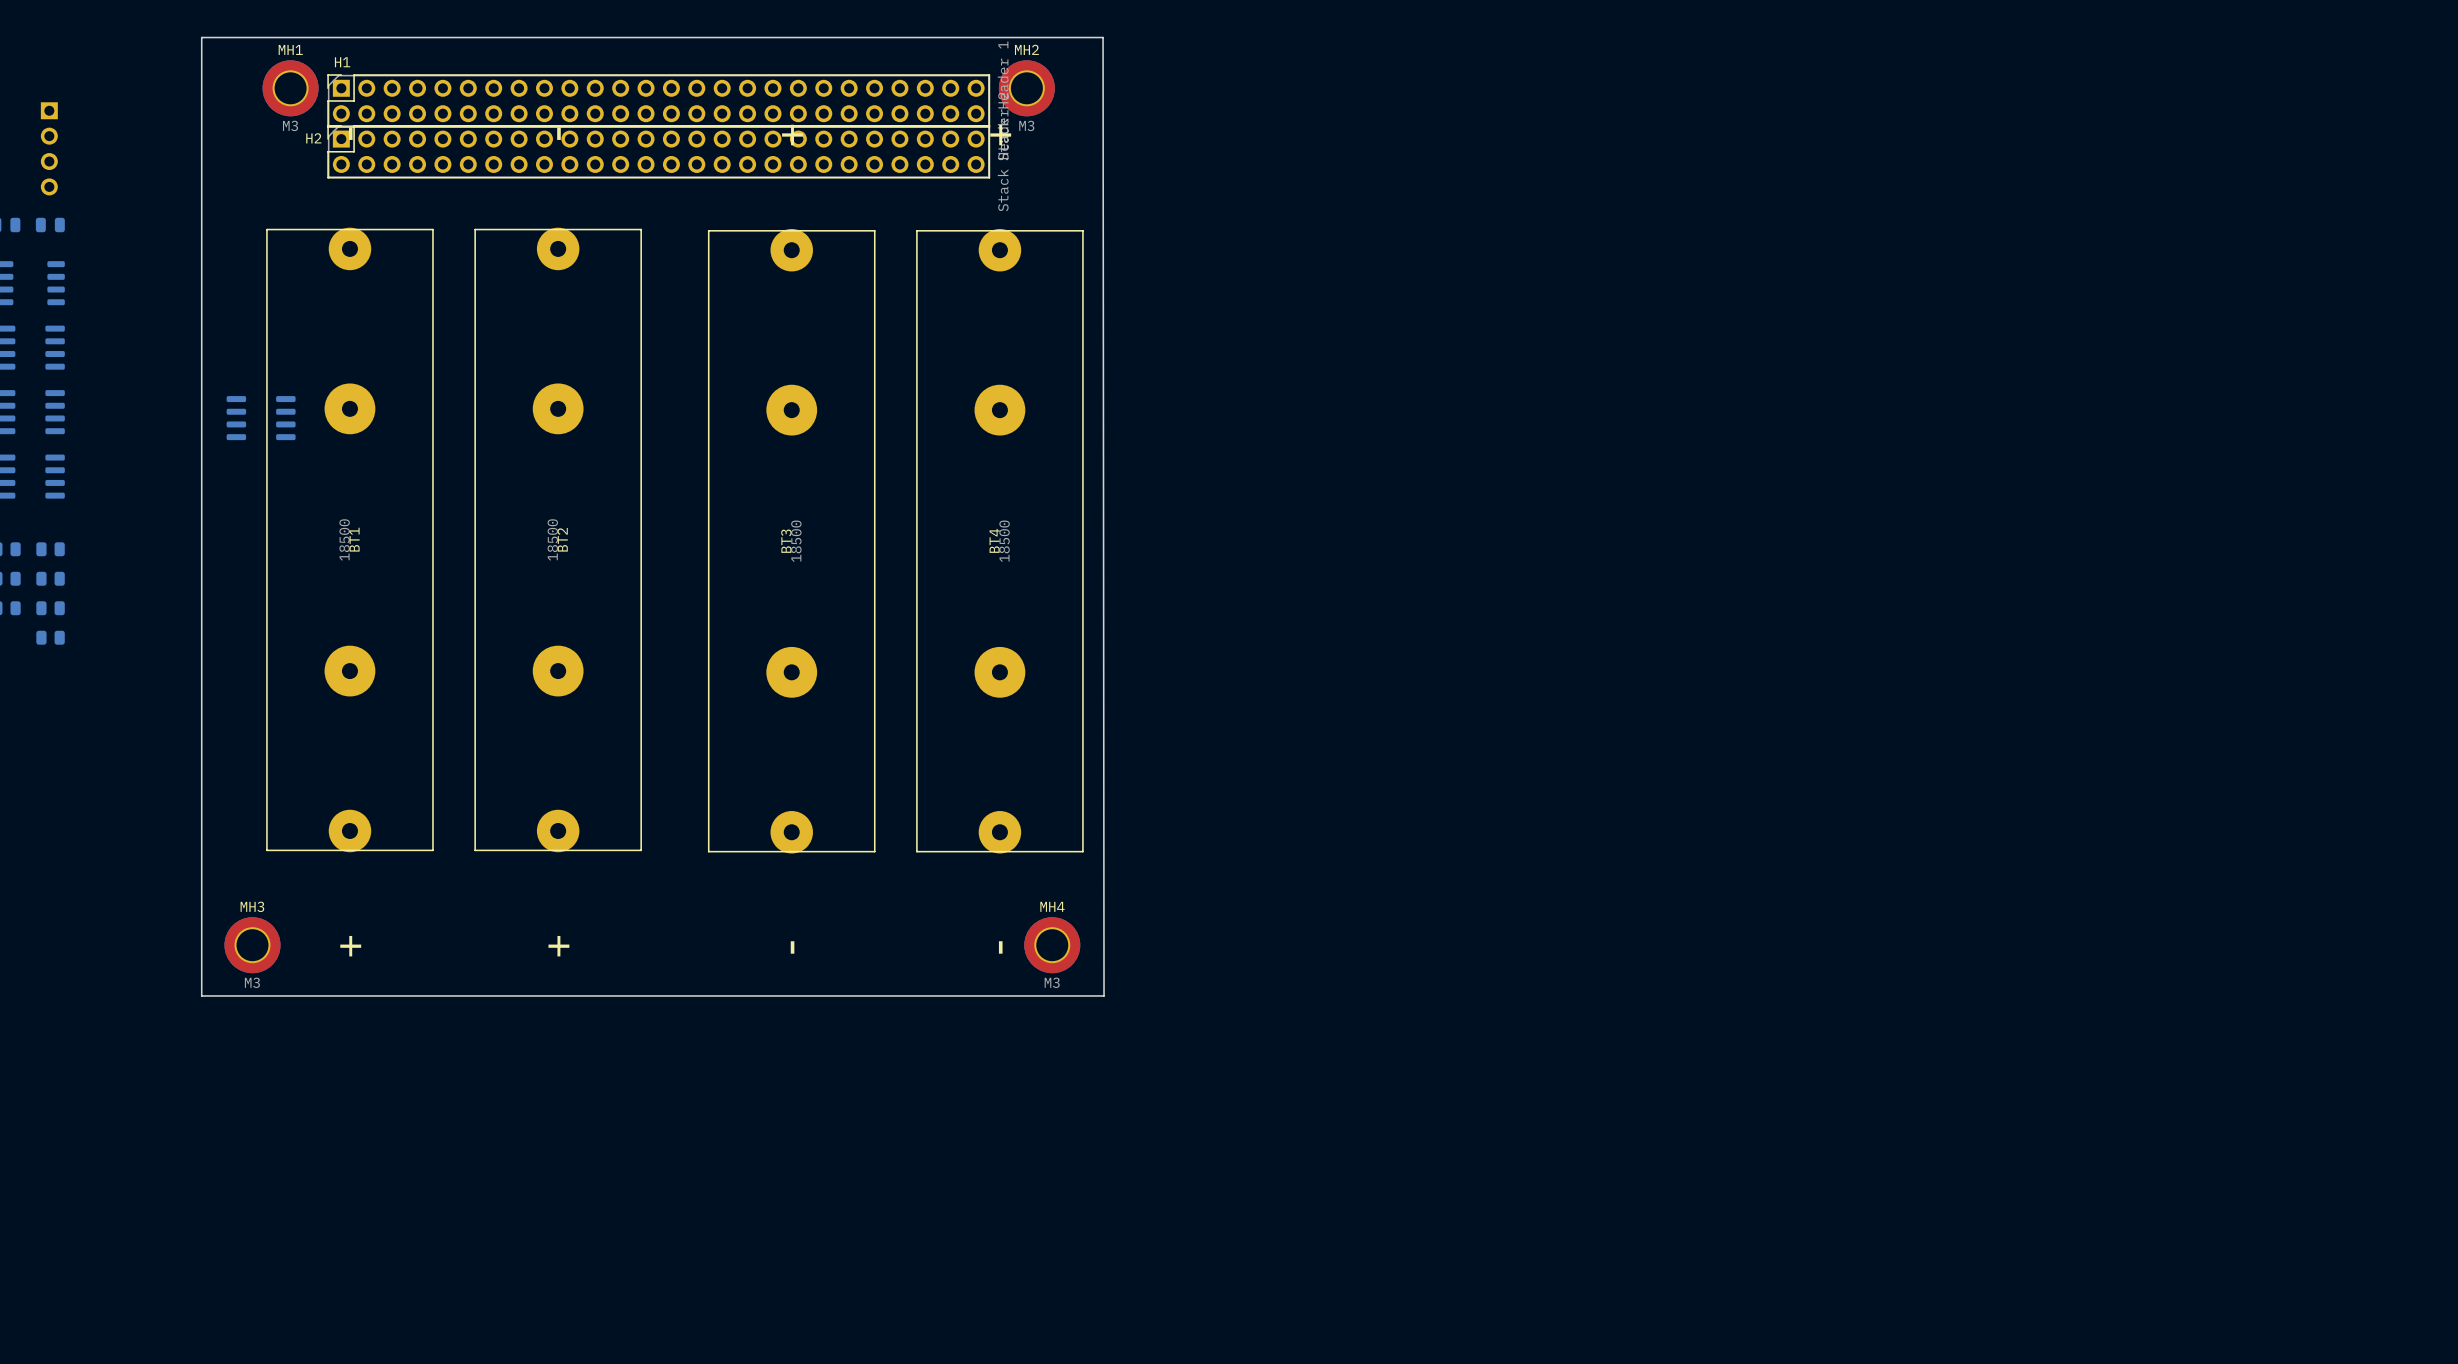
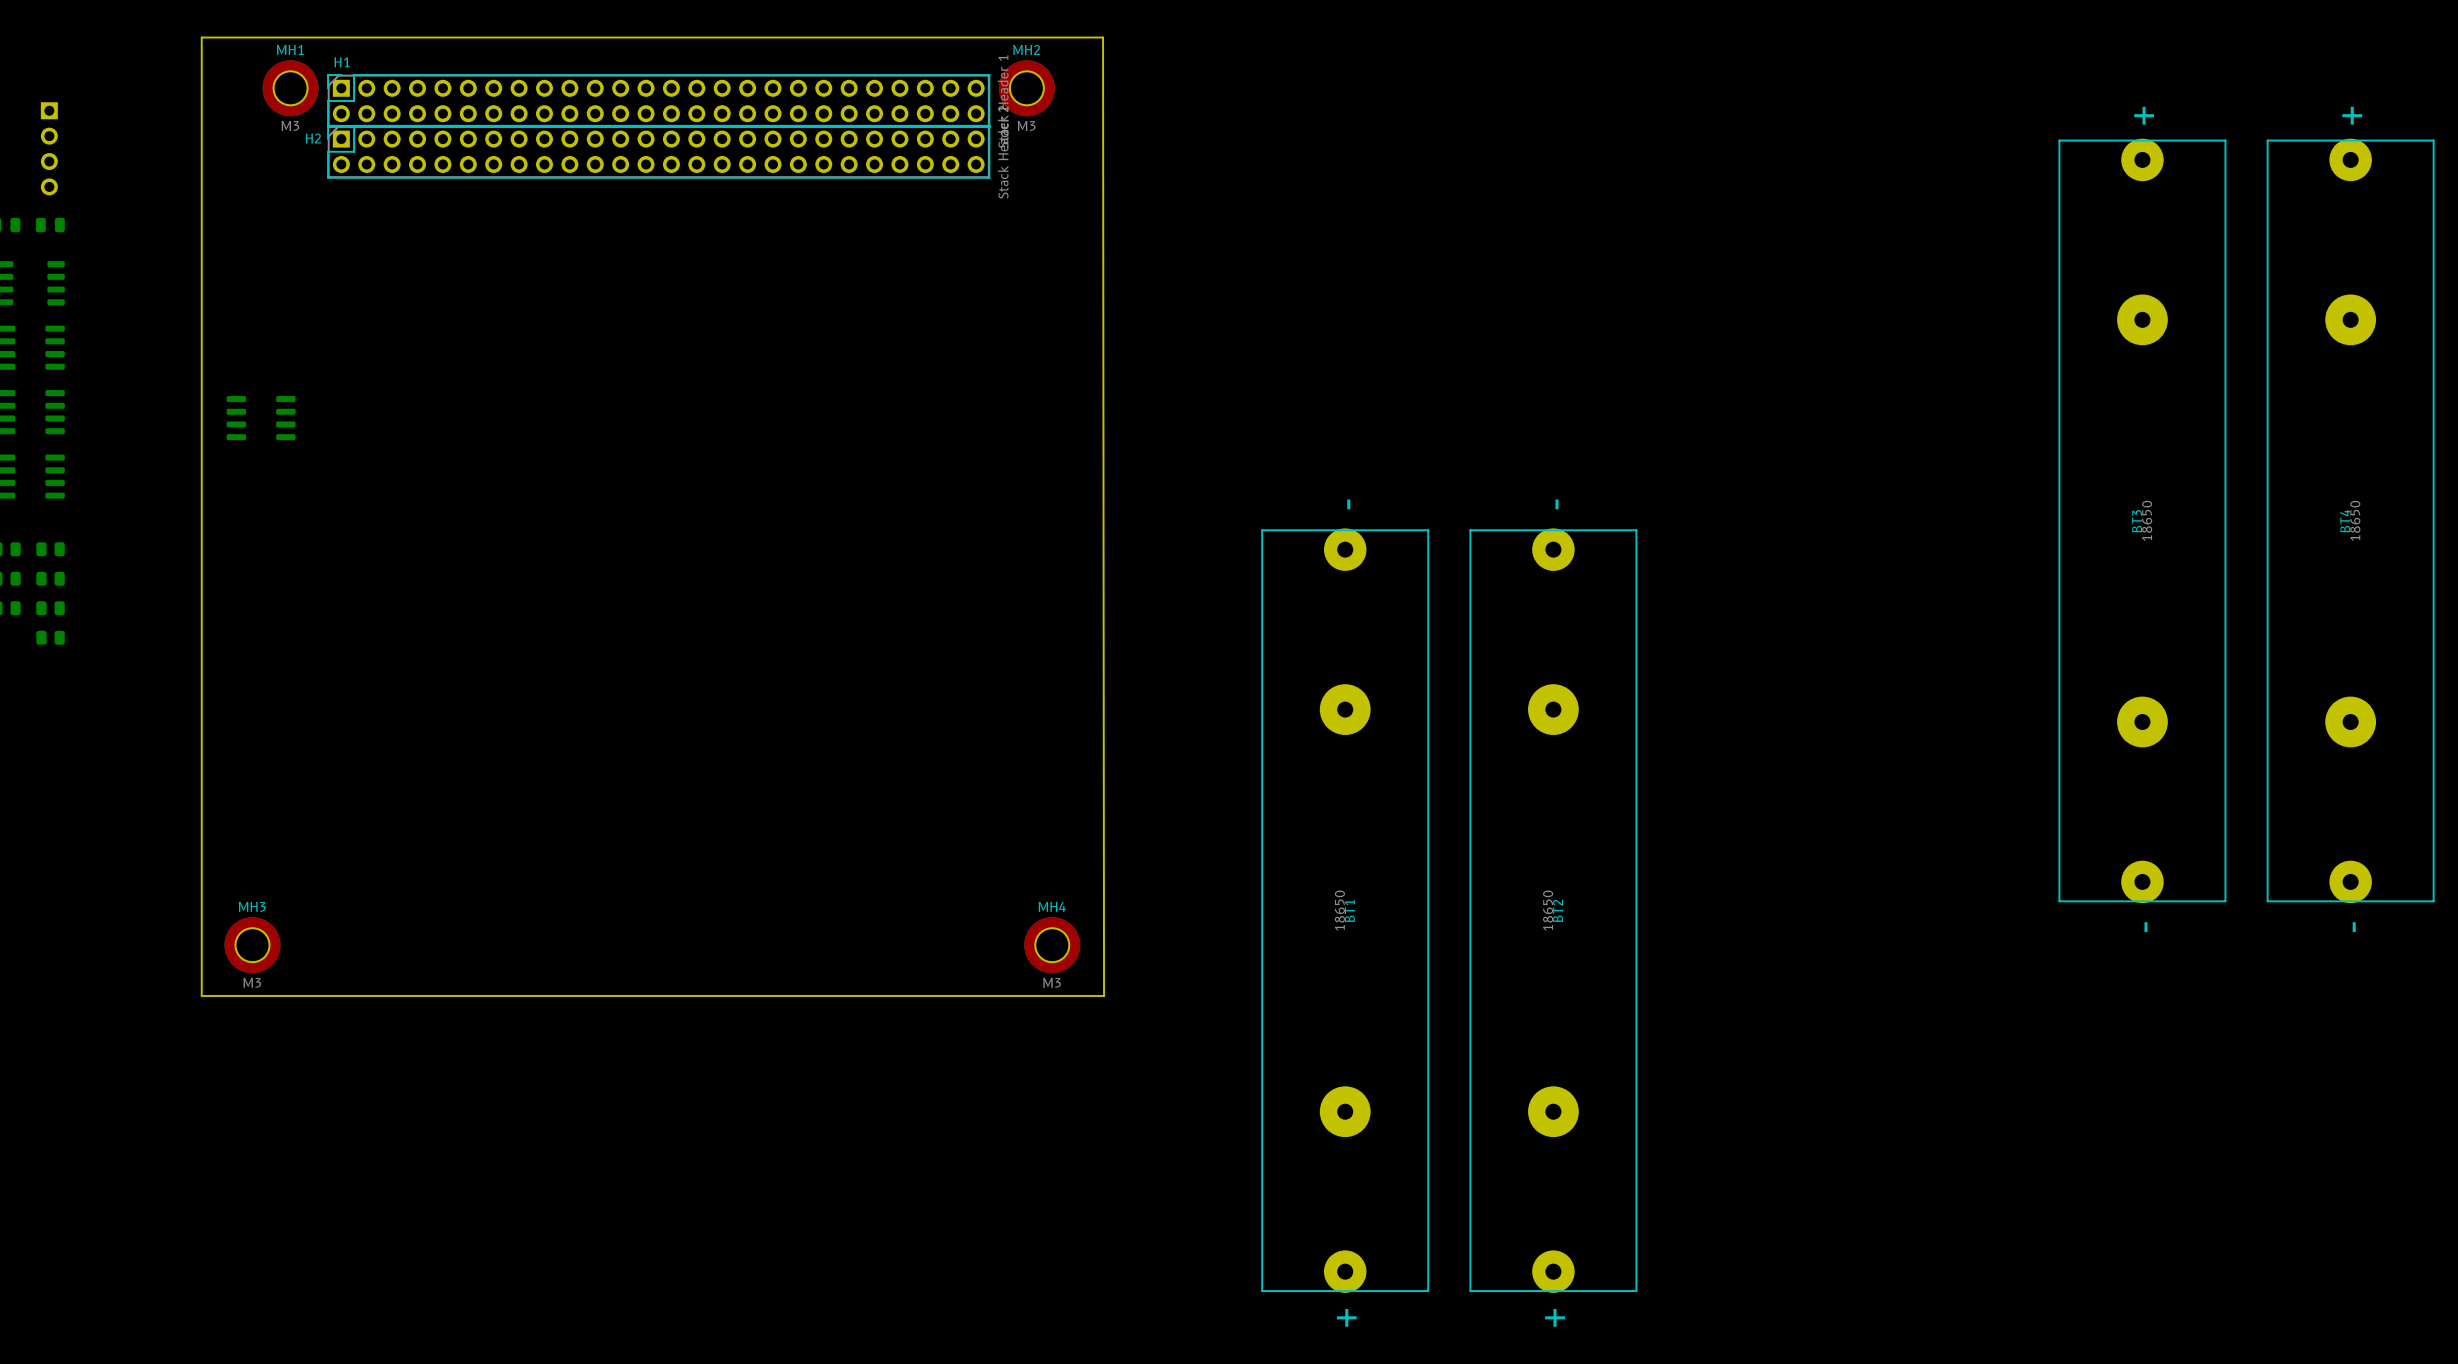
BT1 footprint: [266, 227, 434, 853] -> [1261, 528, 1429, 1293]
BT2 footprint: [474, 227, 642, 853] -> [1469, 528, 1638, 1293]
BT3 footprint: [708, 228, 876, 854] -> [2058, 138, 2227, 904]
BT4 footprint: [916, 228, 1084, 854] -> [2267, 138, 2435, 904]
BT1 value: 18500 (344, 539) -> 18650 (1339, 910)
BT2 value: 18500 (552, 539) -> 18650 (1548, 910)
BT3 value: 18500 (796, 541) -> 18650 (2147, 520)
BT4 value: 18500 (1004, 541) -> 18650 (2355, 520)

